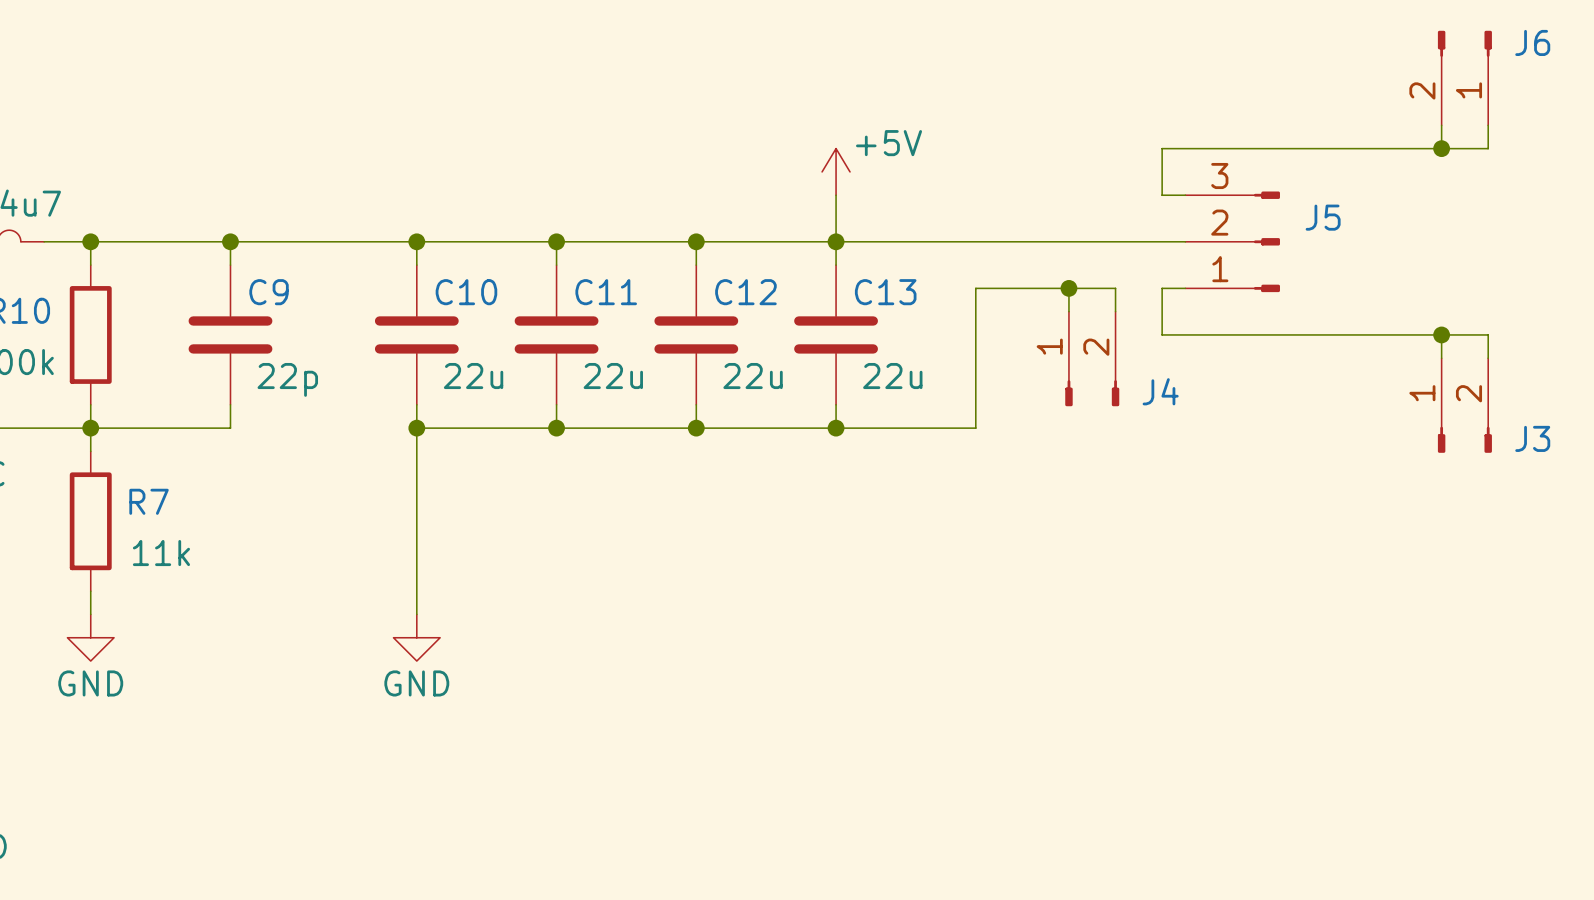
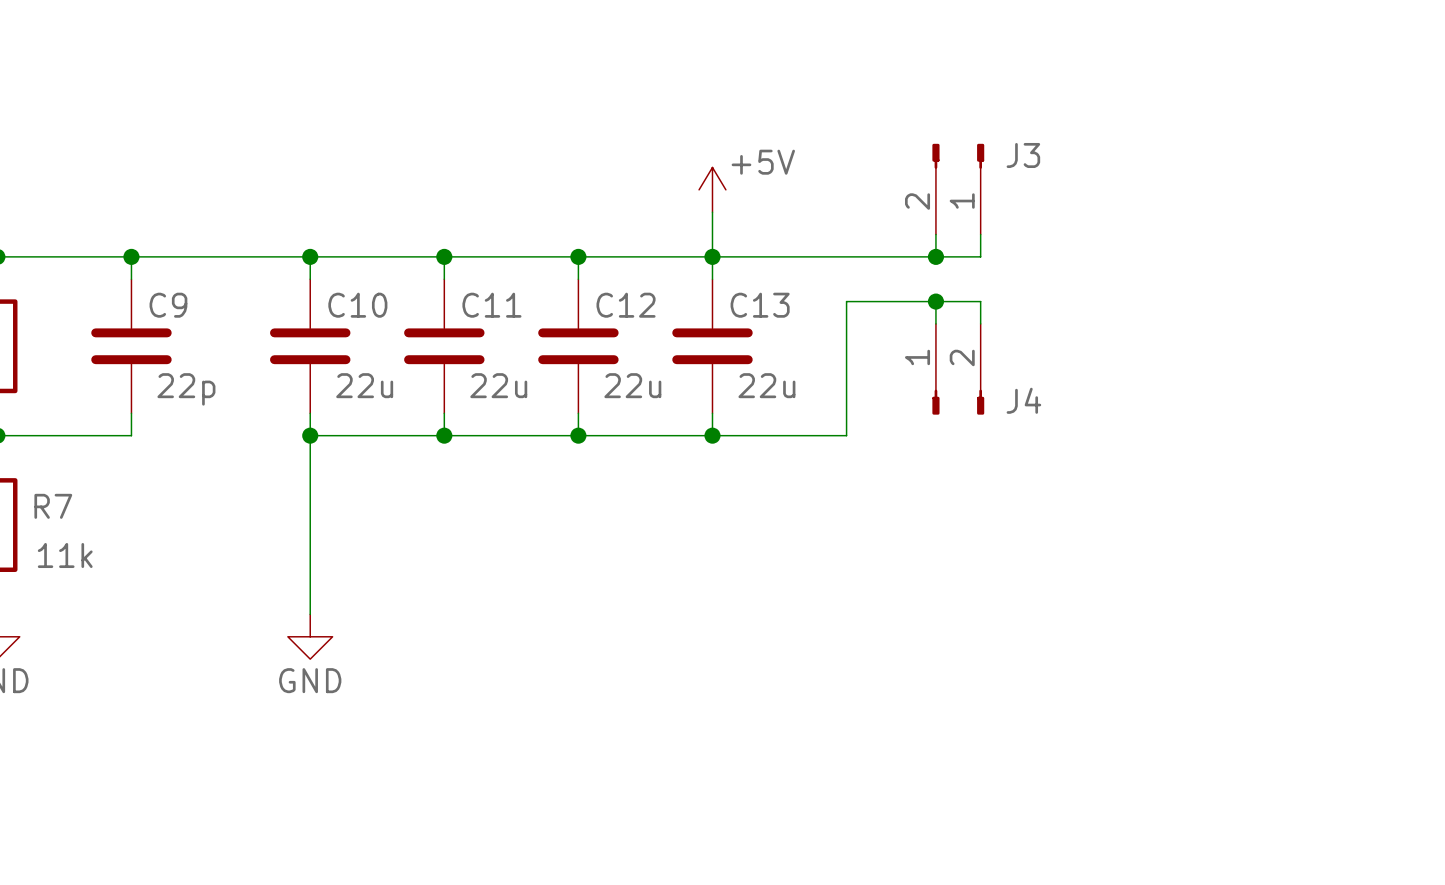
J6: (1464, 78) -> none
wire: (1441, 125) (1441, 148) -> (935, 234) (935, 256)
wire: (1488, 125) (1488, 148) (1162, 148) (1162, 195) (1185, 195) -> none
junction: (1441, 148) -> none
junction: none -> (935, 256)
wire: (1115, 241) (1185, 241) -> (980, 256) (980, 234)
J5: (1232, 241) -> none
wire: (1185, 288) (1162, 288) (1162, 334) (1488, 334) (1488, 358) -> none
wire: (1441, 334) (1441, 358) -> none
junction: (1441, 334) -> none
J3 position: (1464, 405) -> (958, 189)
J3 name position: J3 (1532, 438) -> J3 (1023, 155)
J3 rotation: 0° (1464, 439) -> 180° (958, 156)

